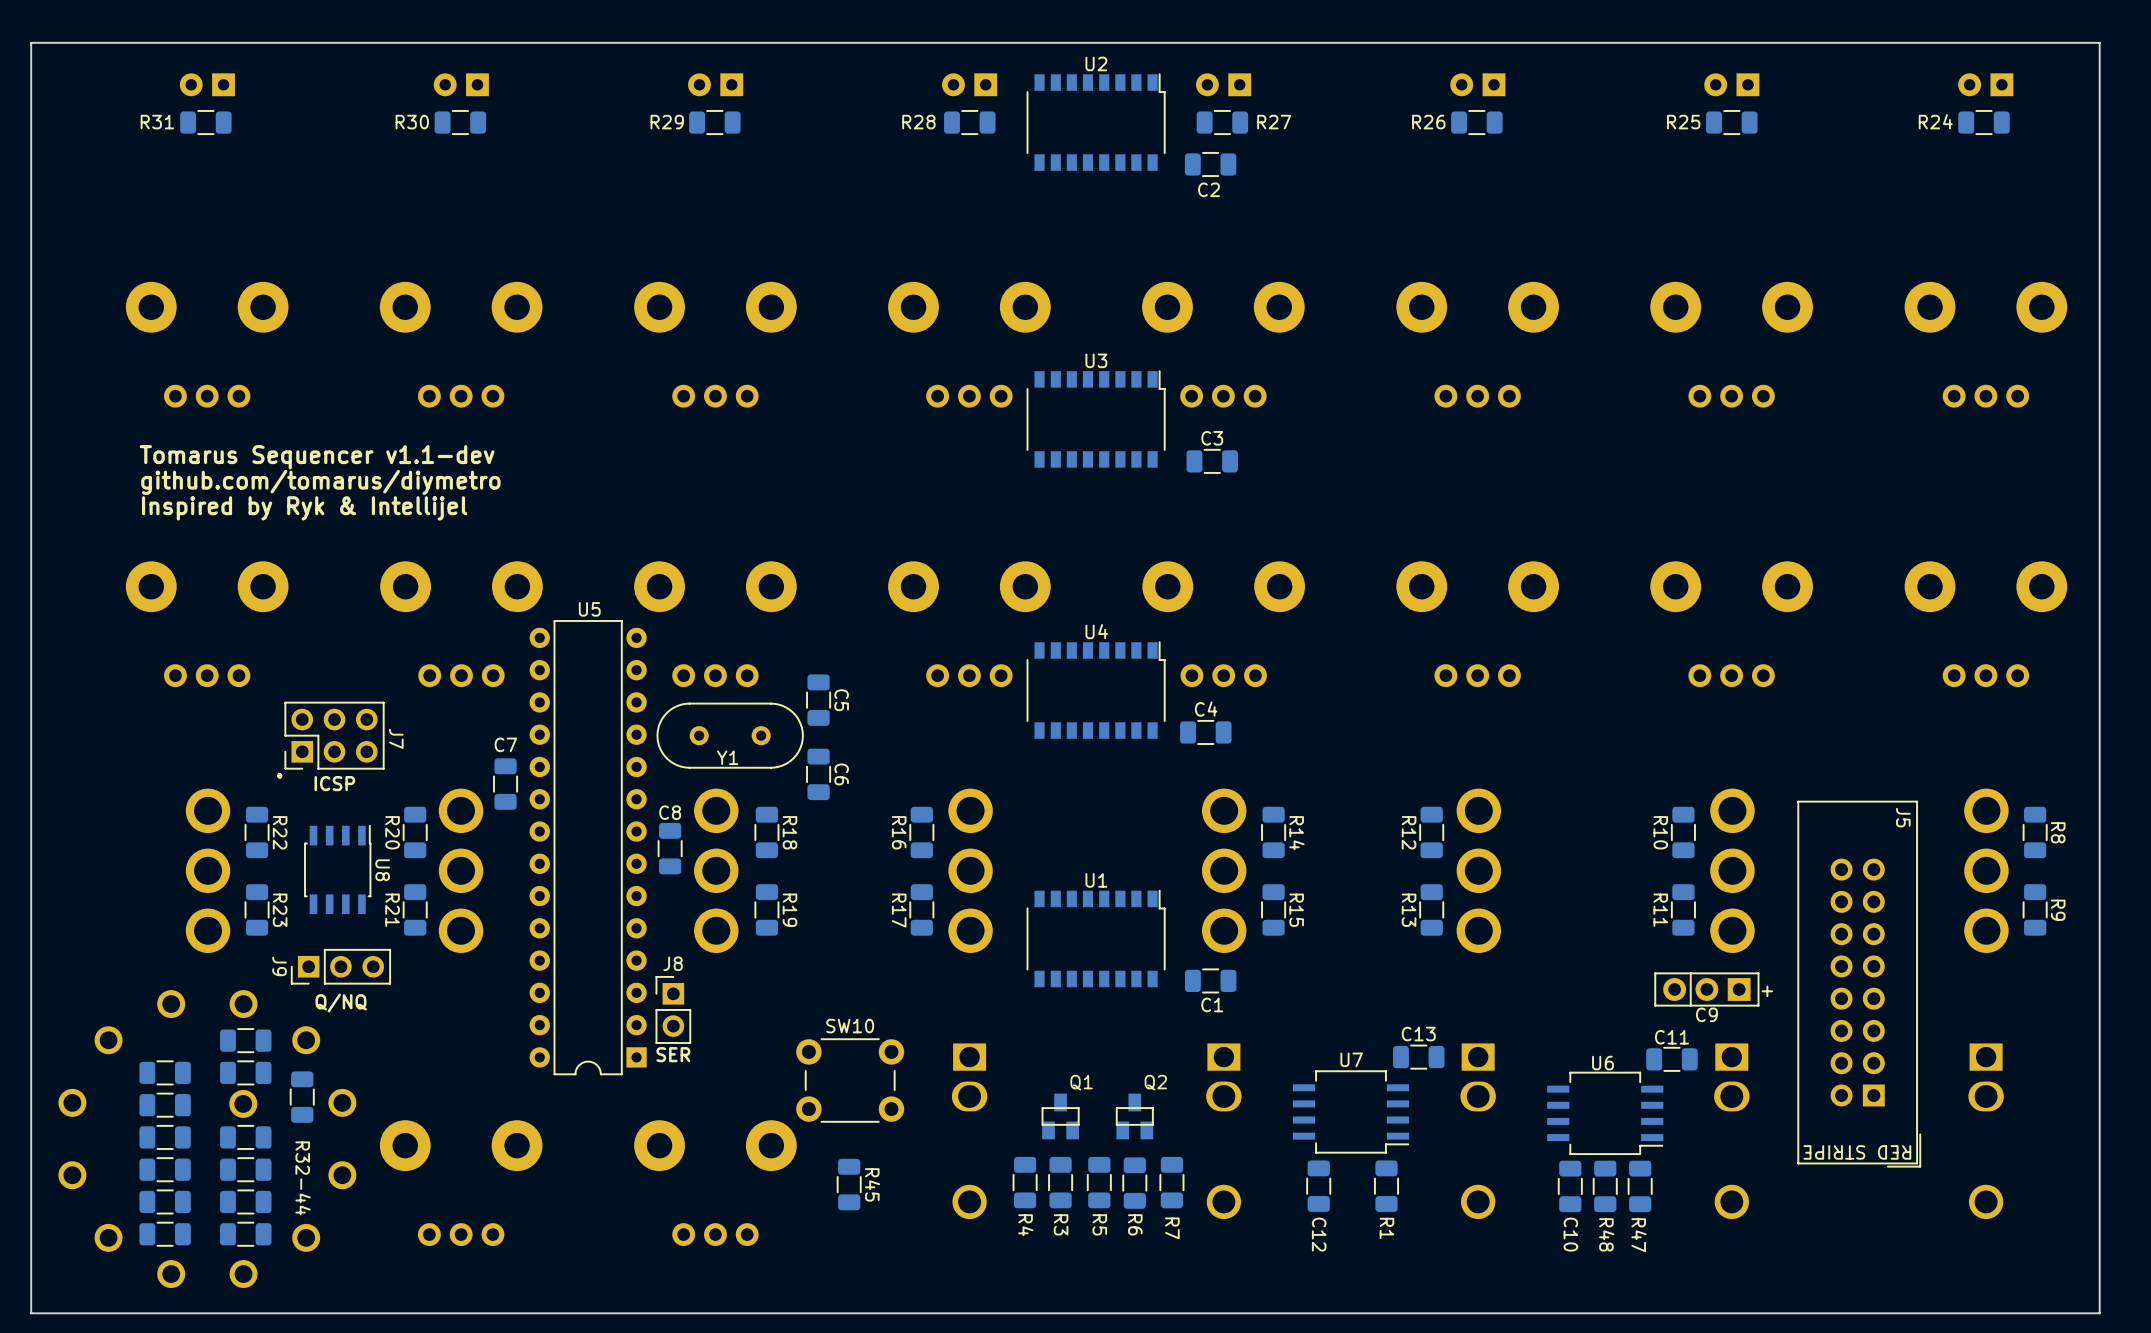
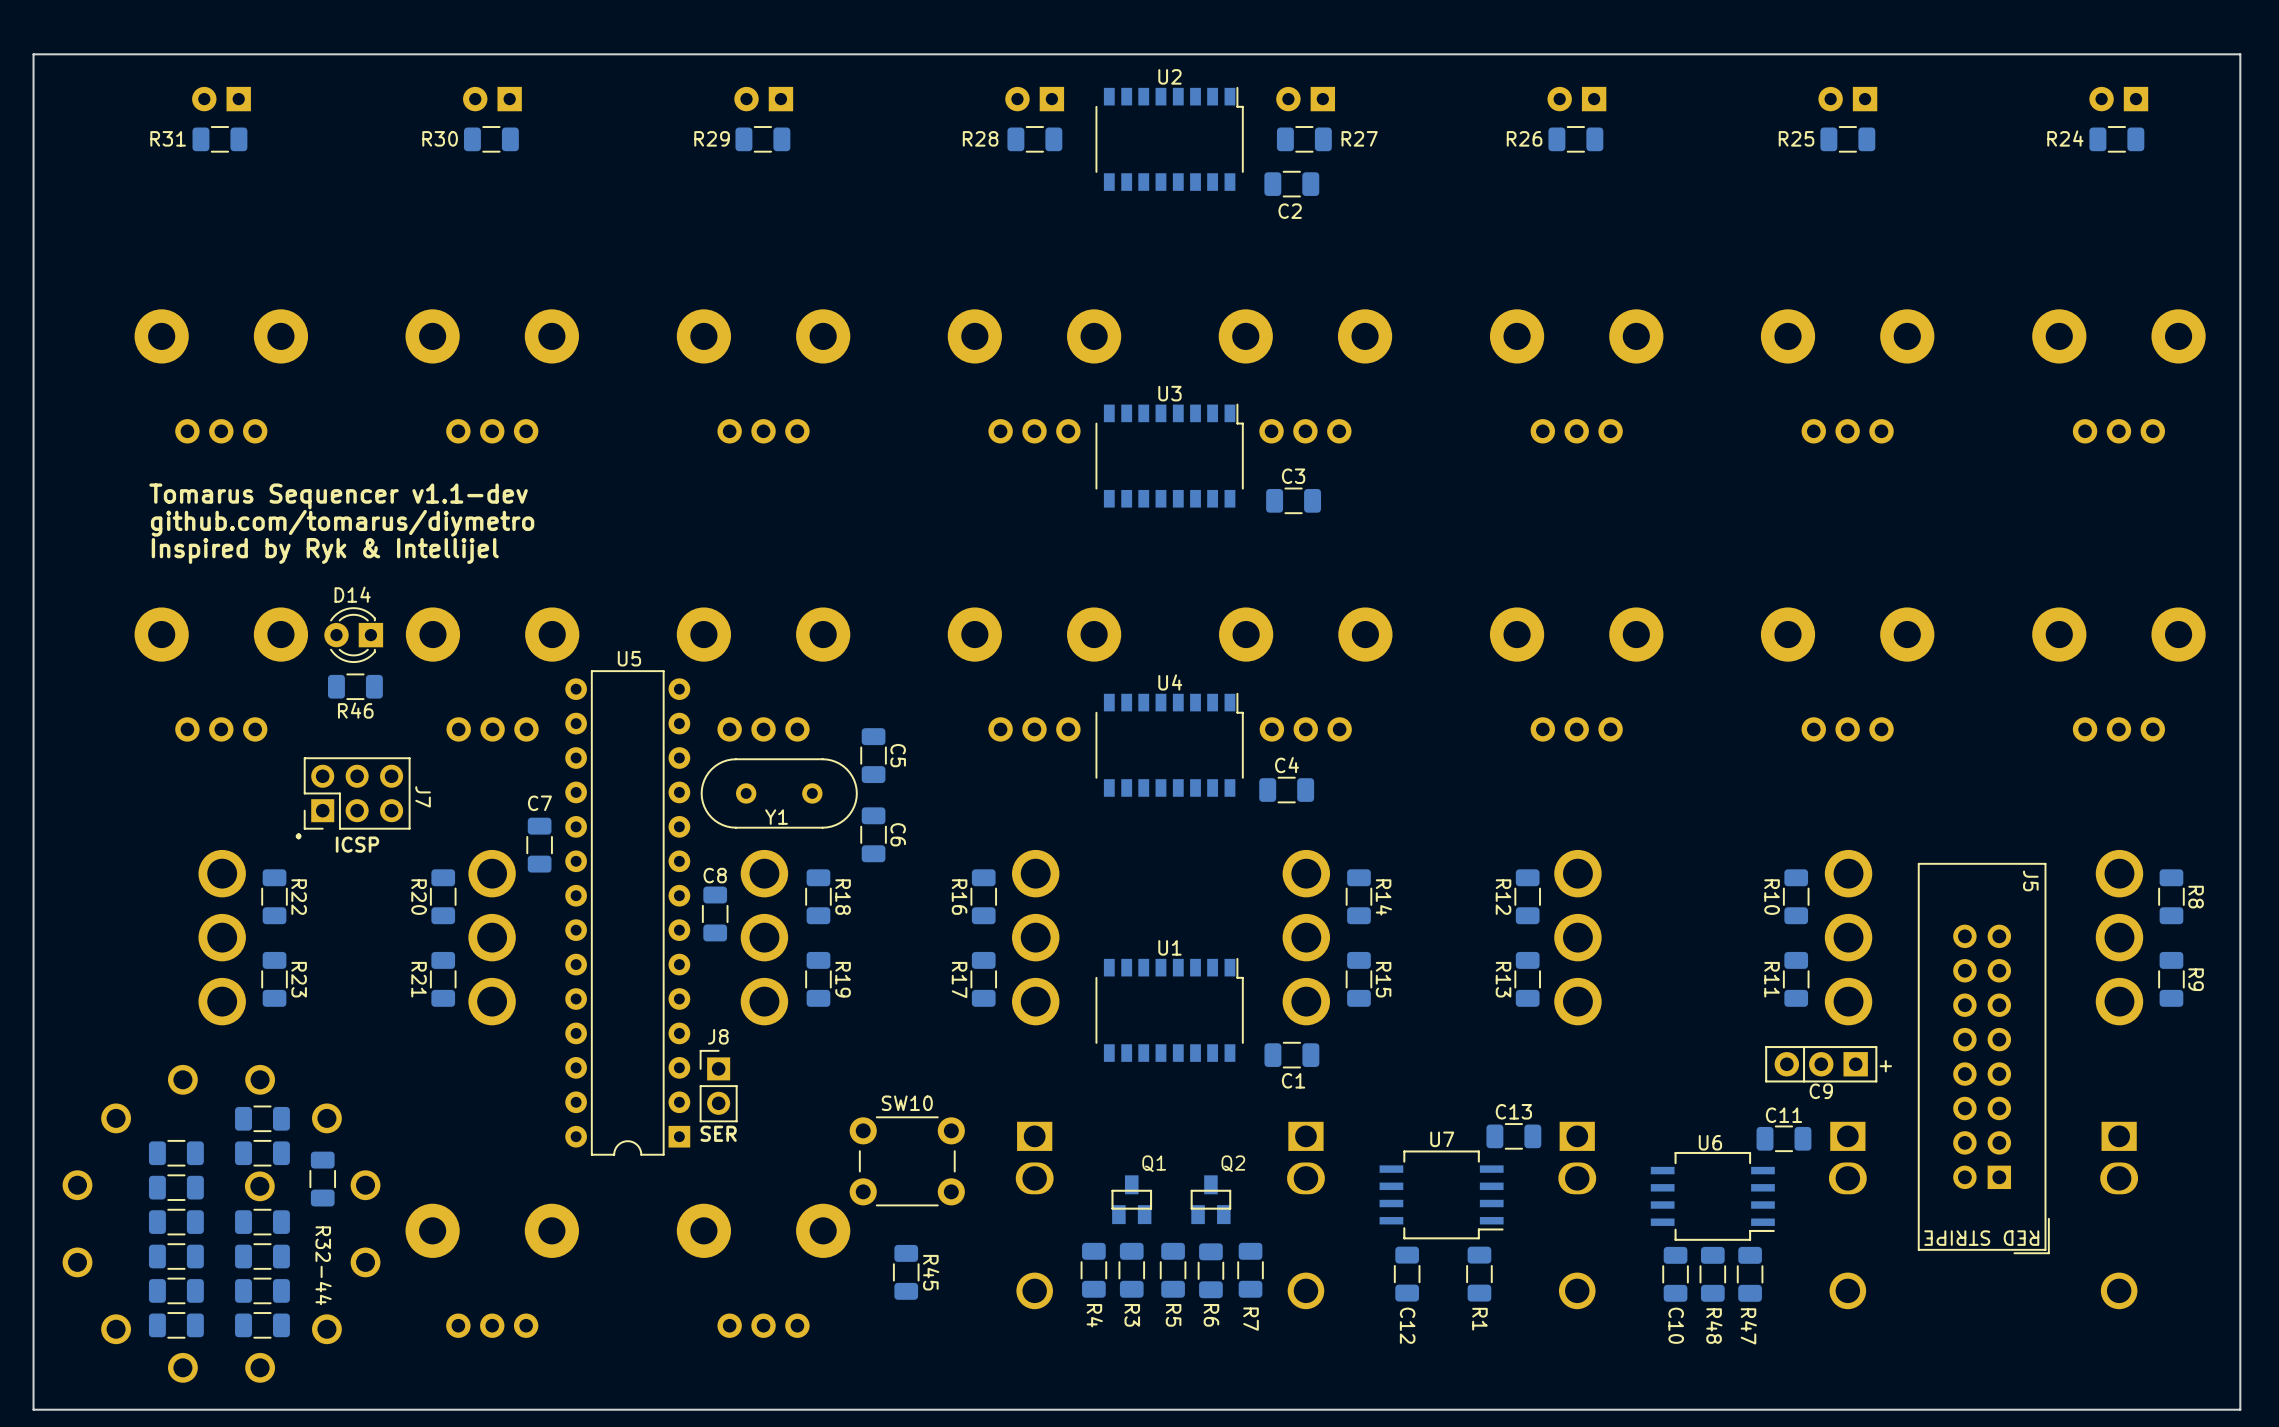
D14: none -> (353, 635)
R46: none -> (355, 686)
U8: (337, 869) -> none
J9: (340, 966) -> none
text: Q/NQ (341, 1002) -> none

